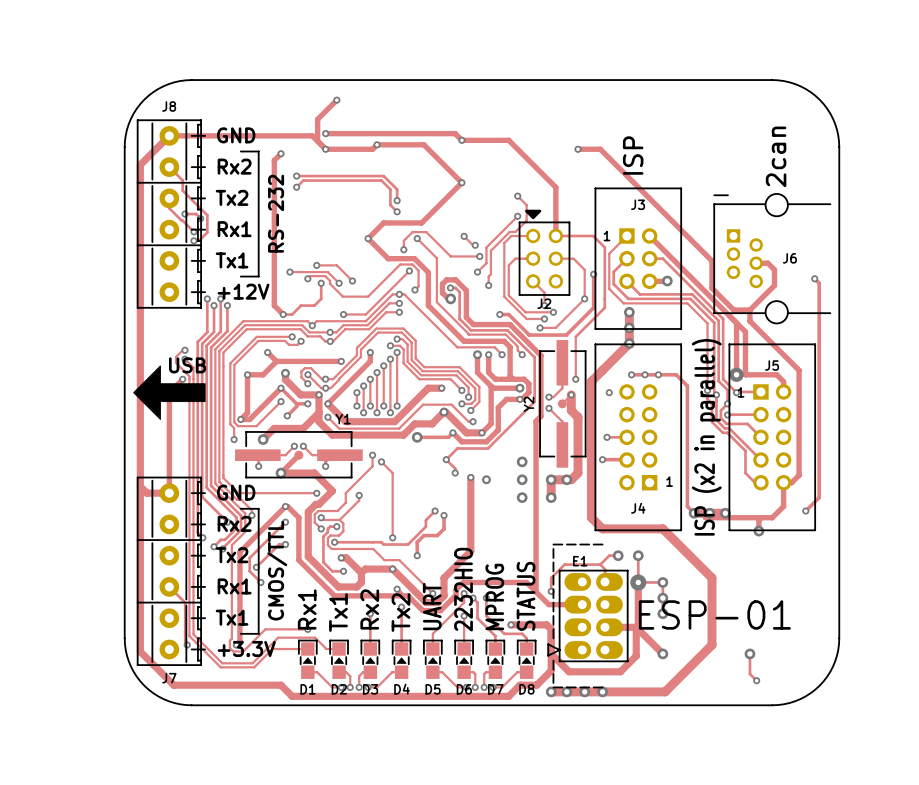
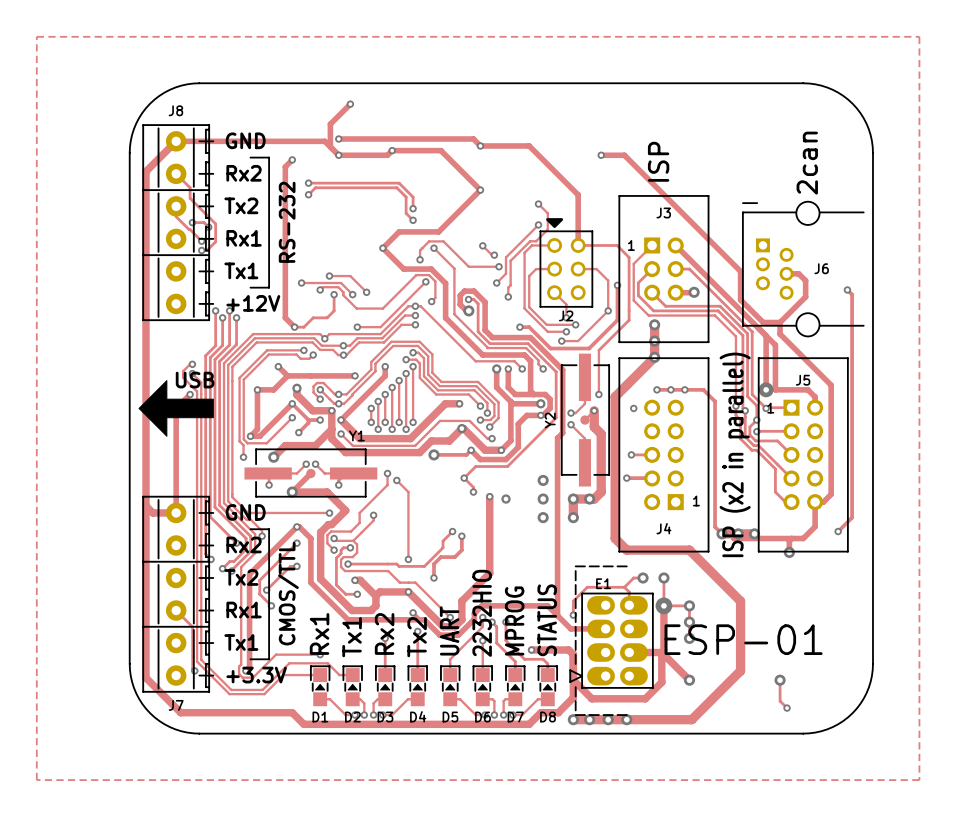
zone outline: none -> (36, 36) (36, 780) (919, 780) (919, 36) (36, 36)

